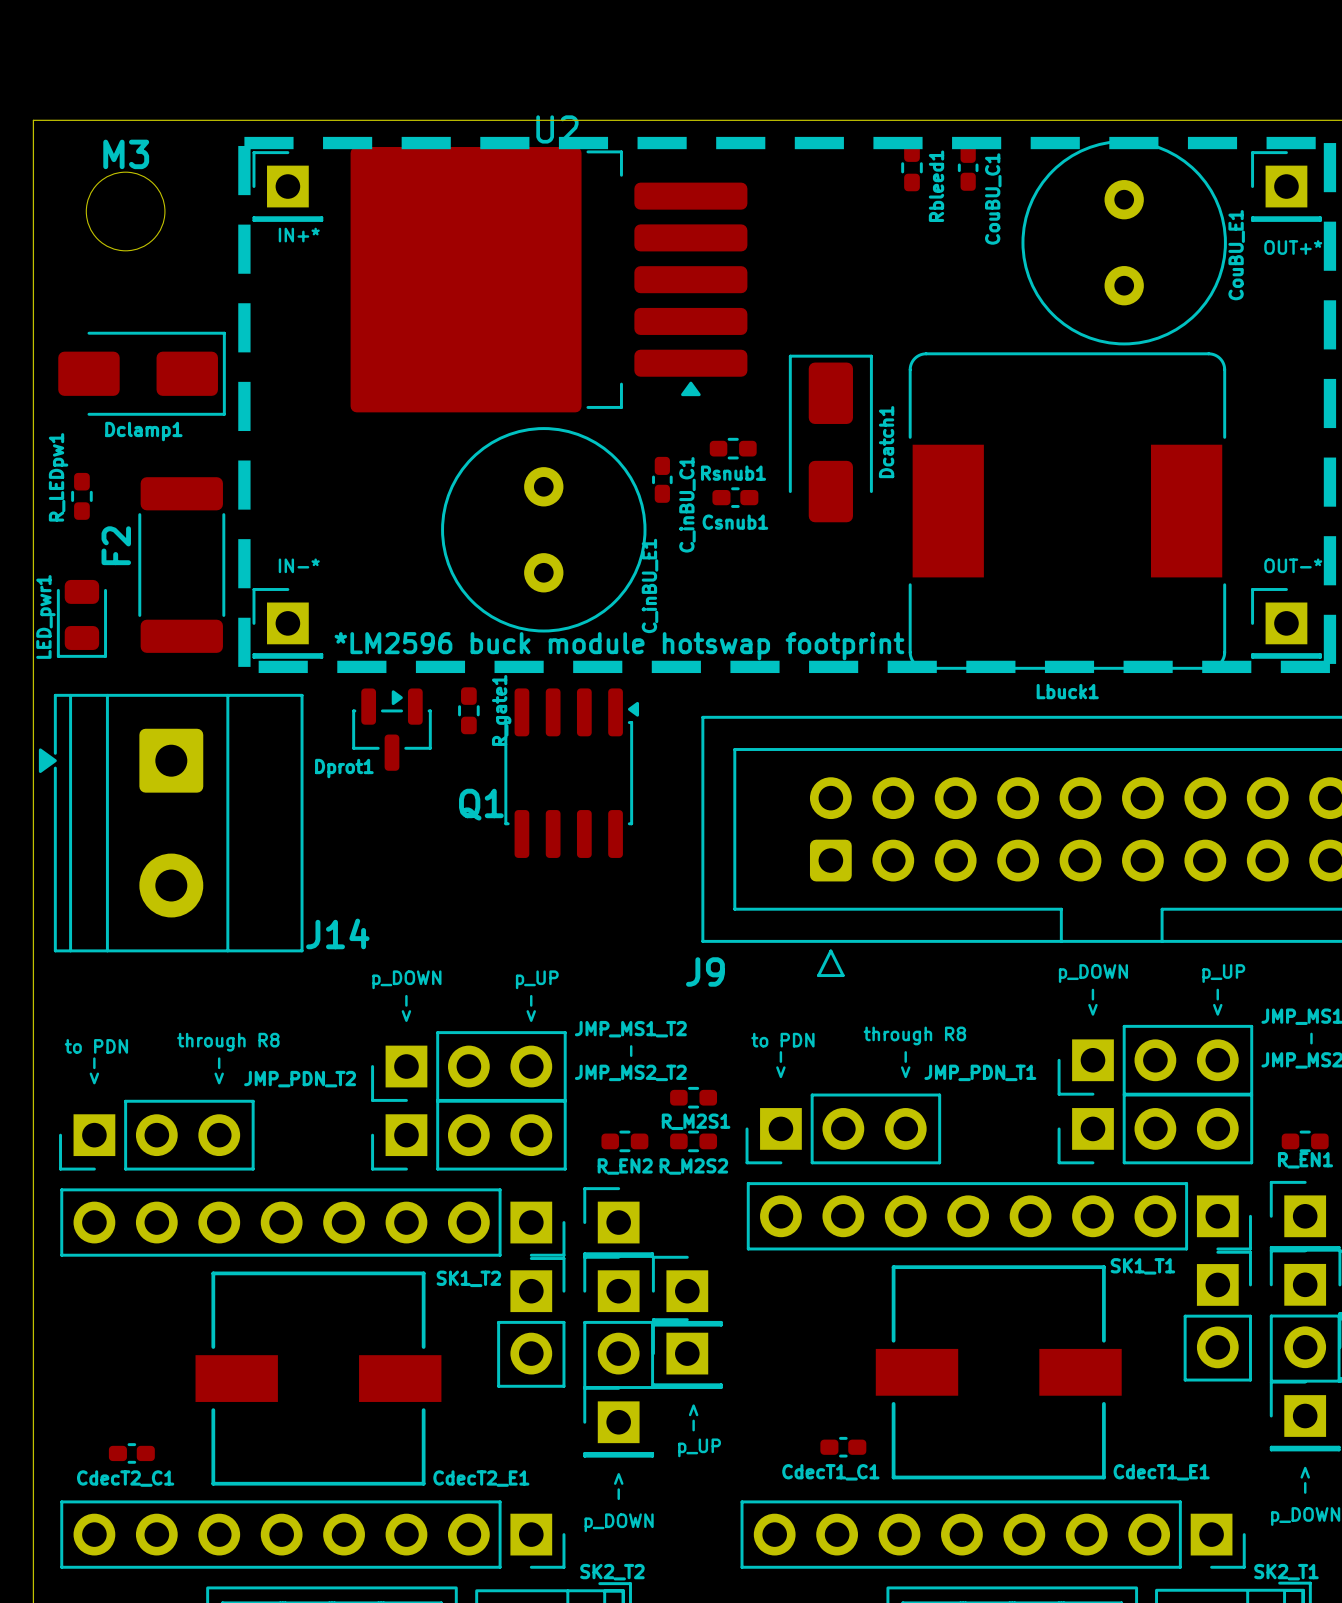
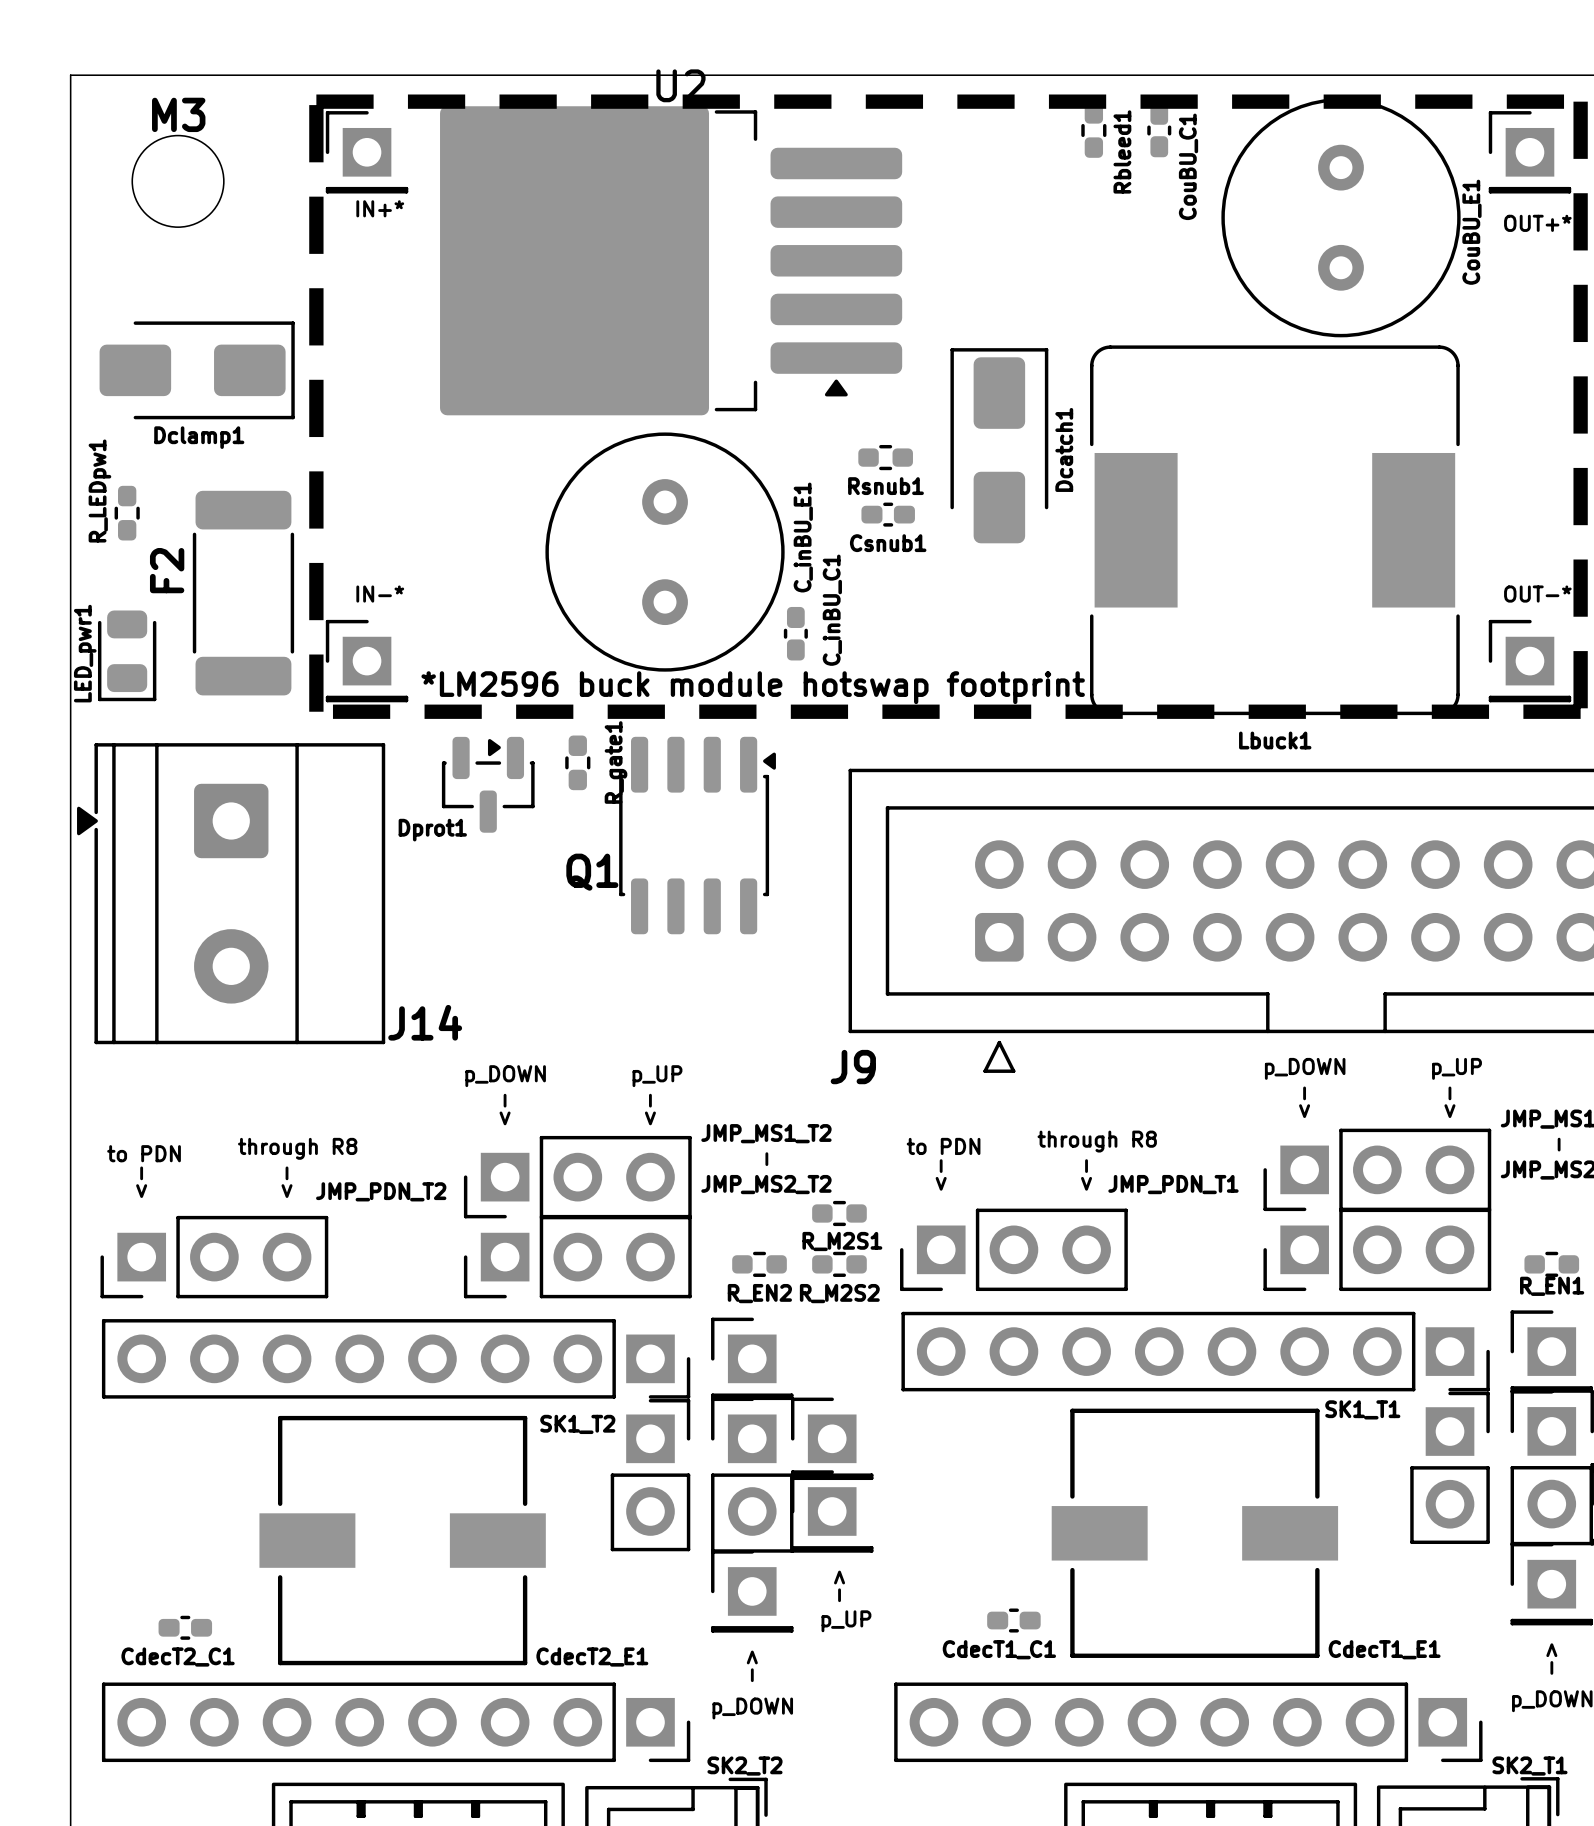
C_inBU_C1 position: (662, 479) -> (795, 633)
C_inBU_C1 name position: C_inBU_C1 (687, 504) -> C_inBU_C1 (832, 610)
C_inBU_E1 name position: C_inBU_E1 (650, 585) -> C_inBU_E1 (803, 537)

